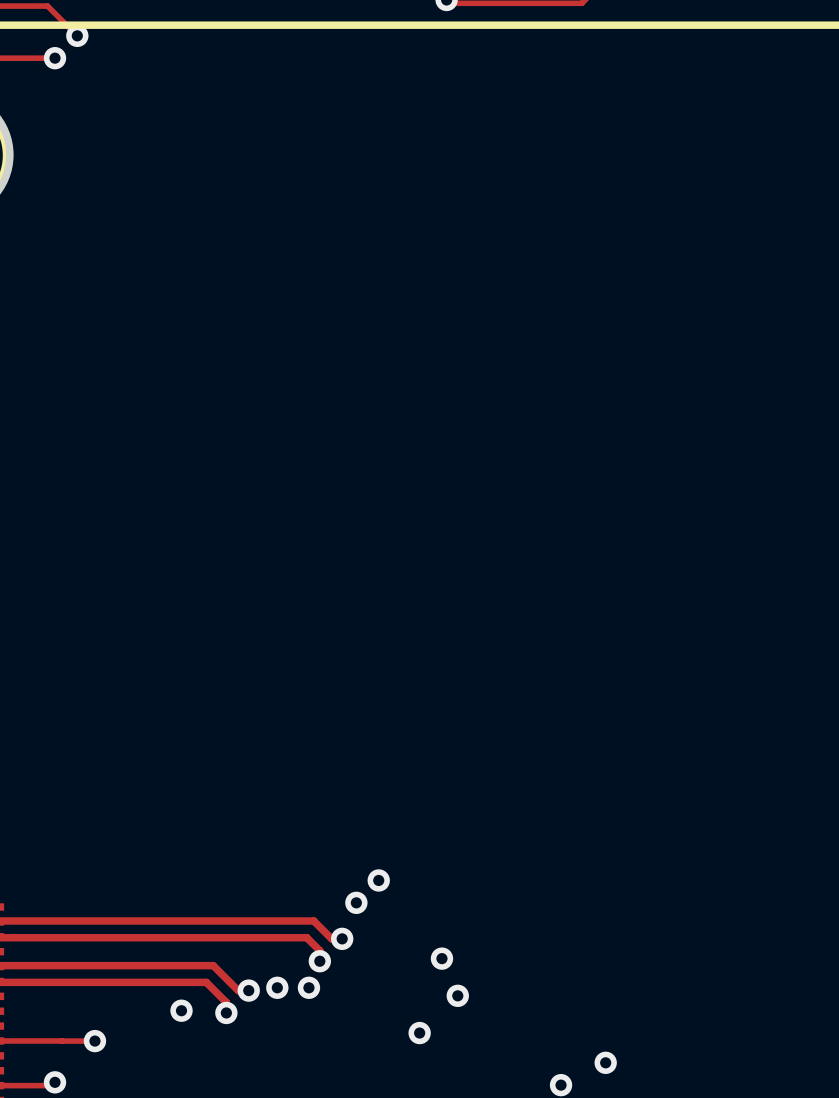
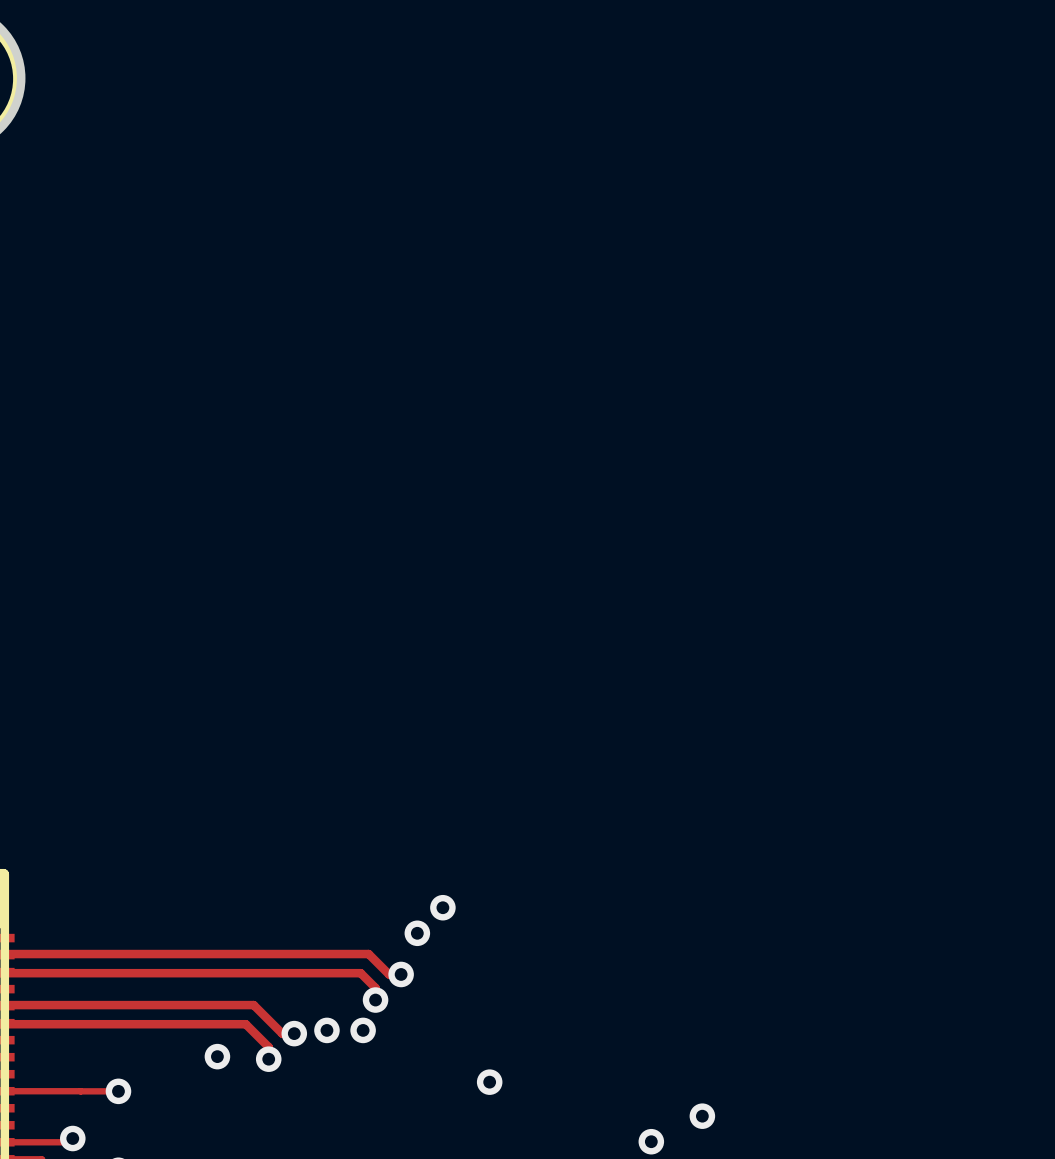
via: (441, 958) -> none
via: (457, 995) -> none

